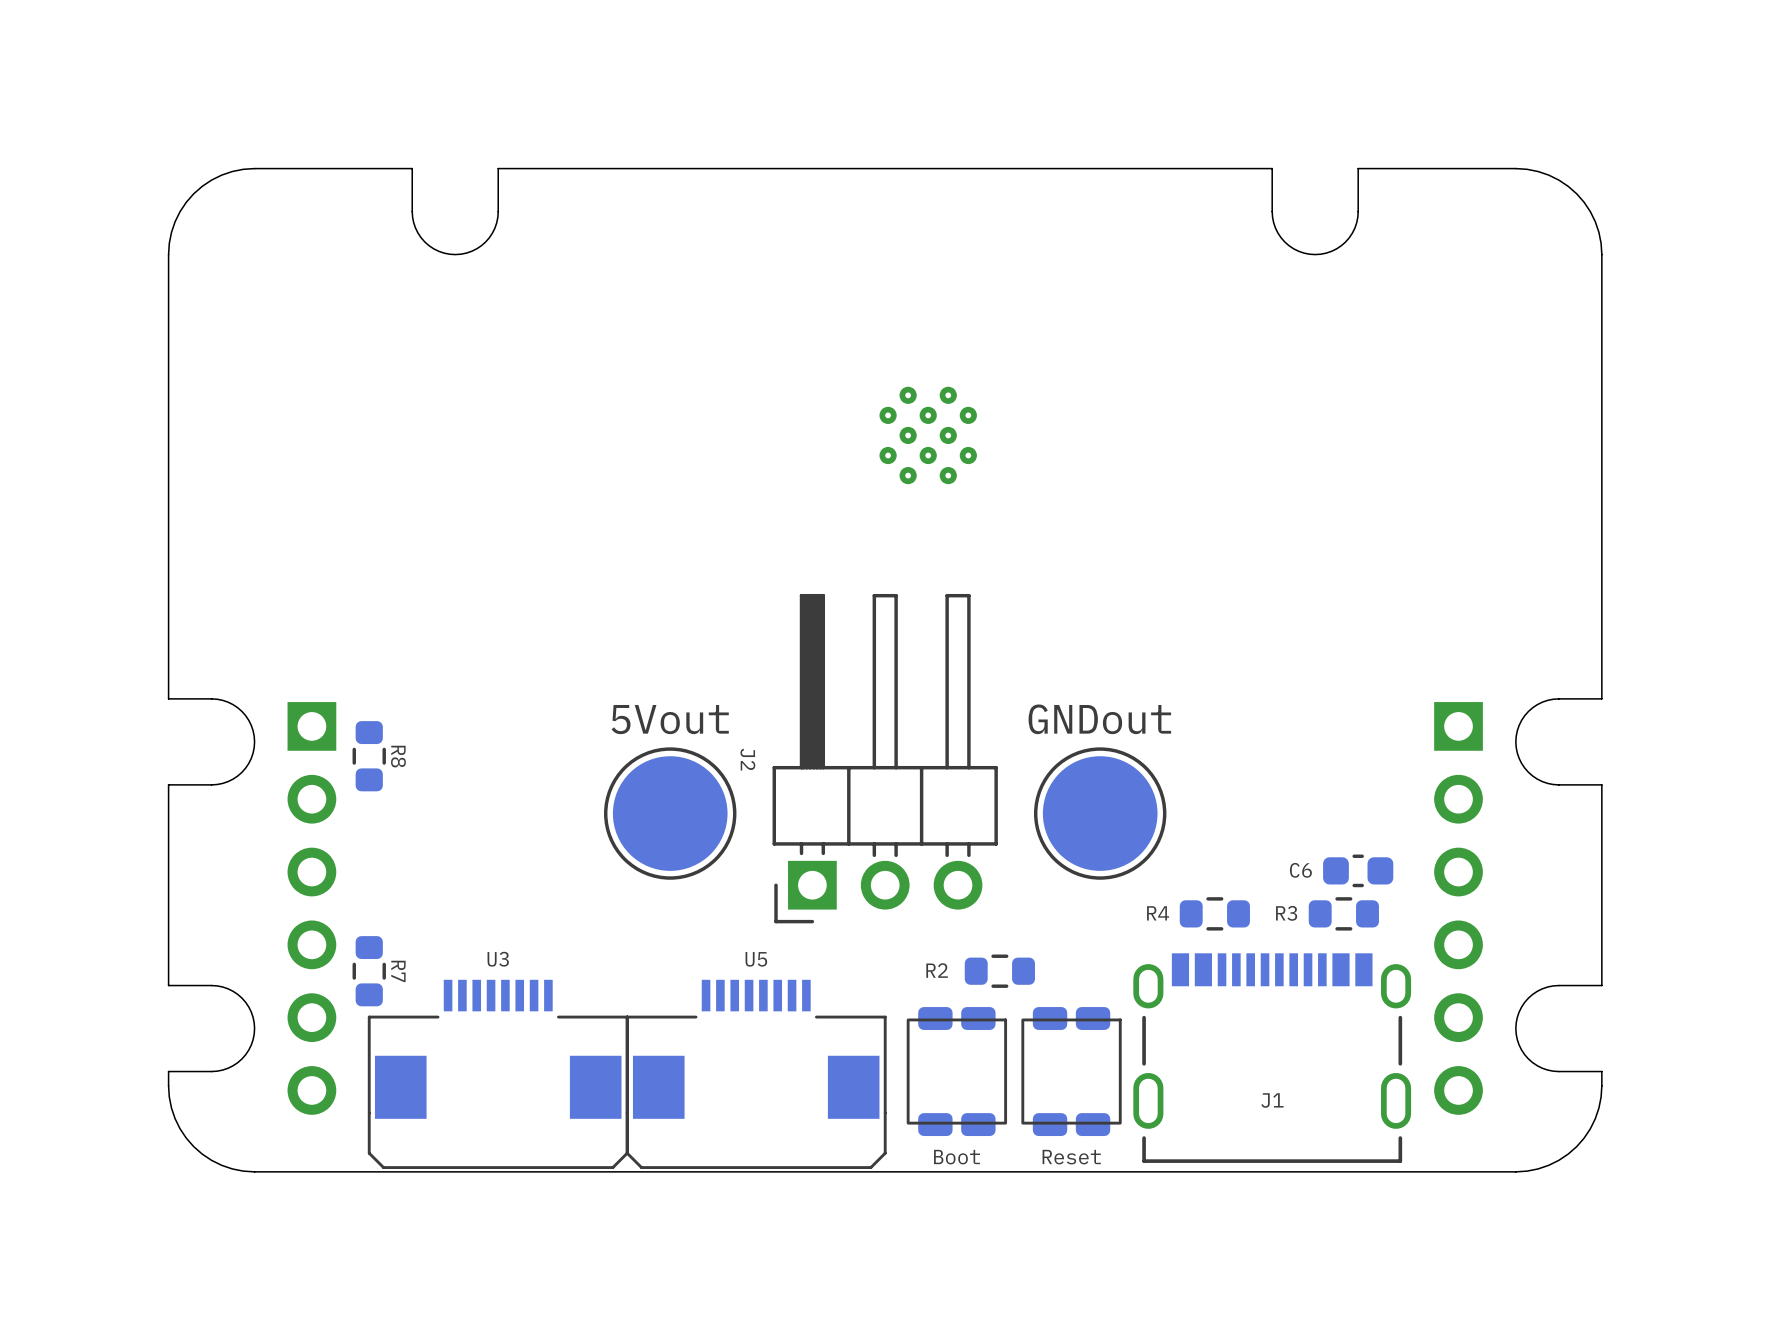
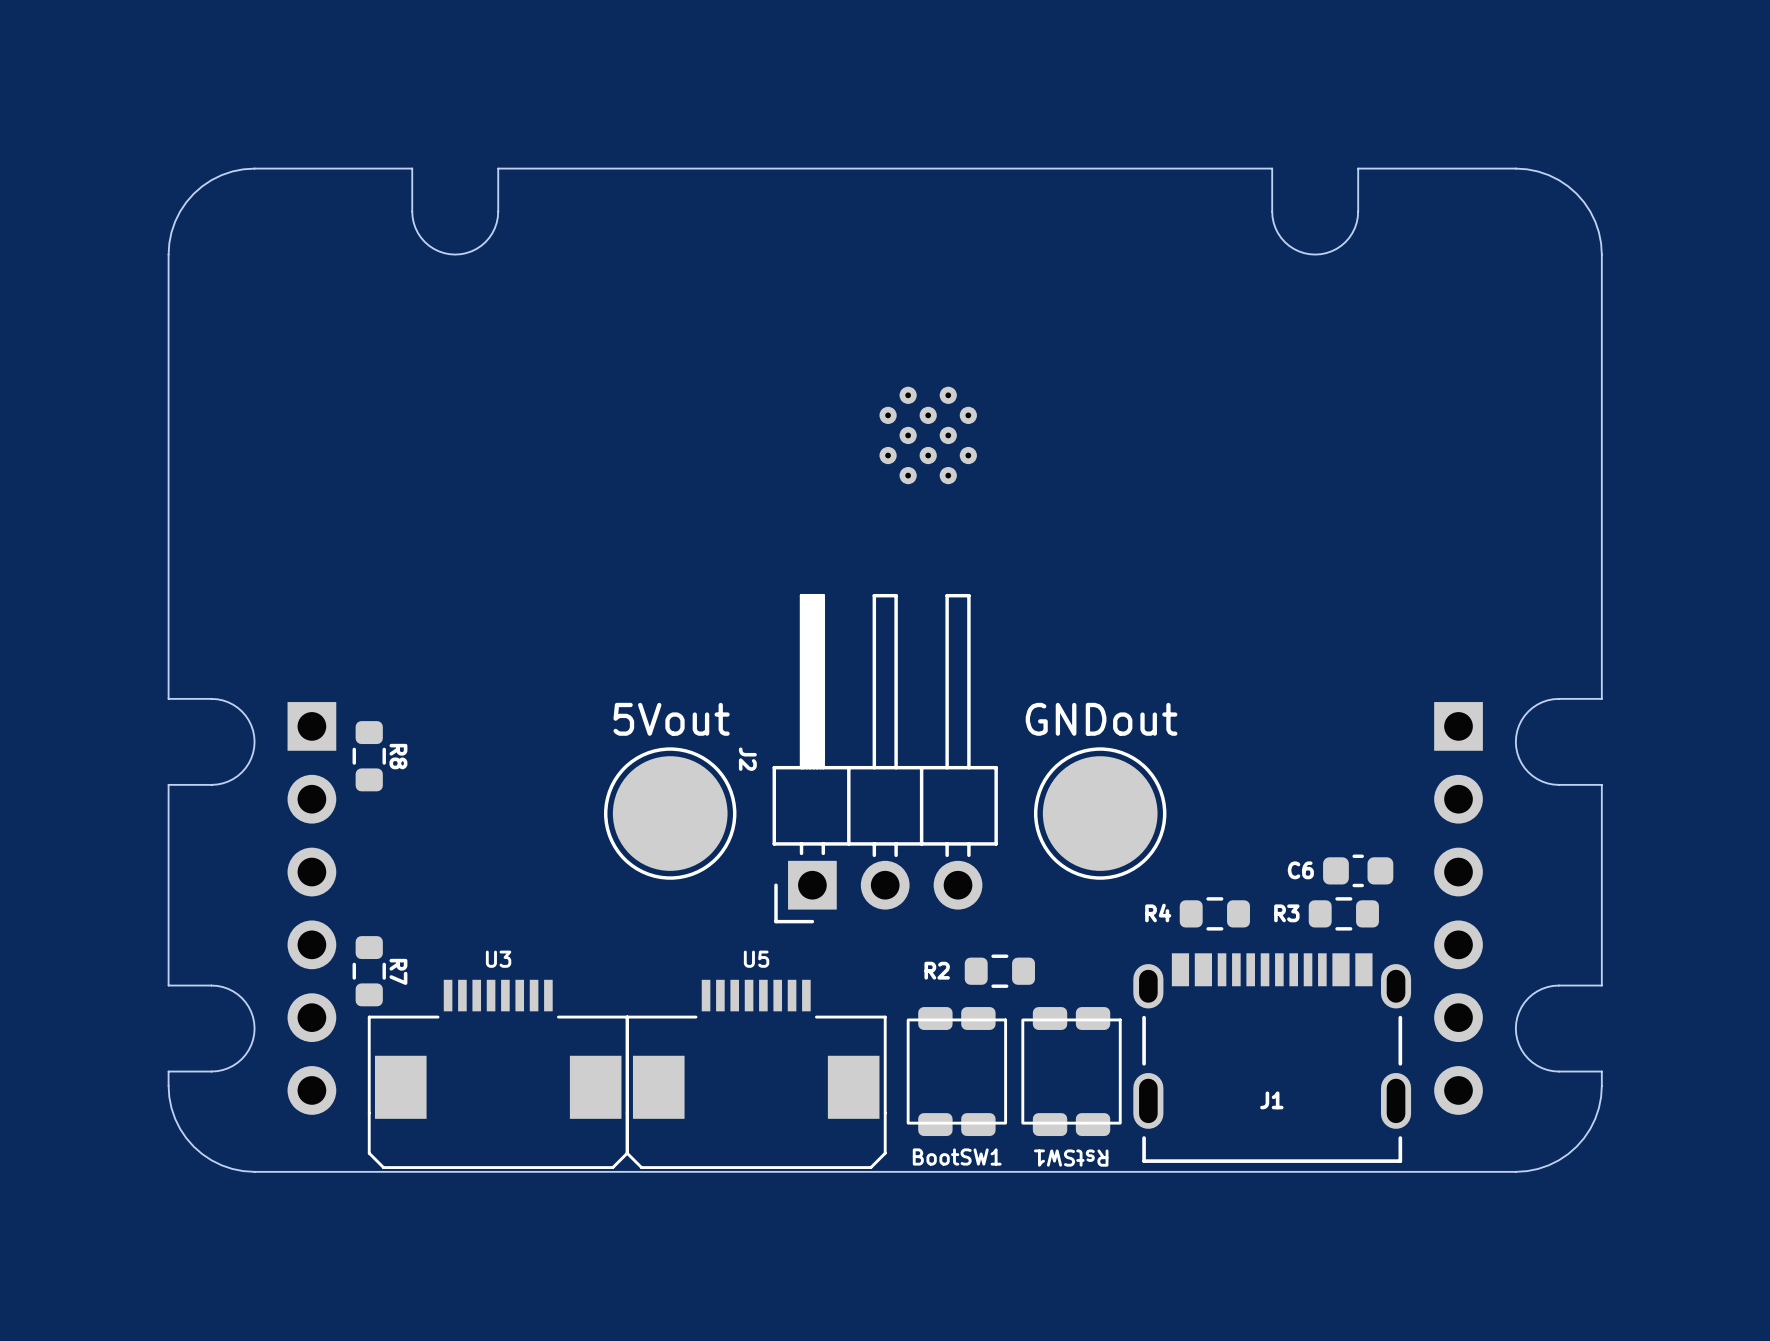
BootSW1 name: none -> BootSW1 (957, 1156)
BootSW1 value: Boot (957, 1157) -> none
RstSW1 value: Reset (1071, 1157) -> none
RstSW1 name: none -> RstSW1 (1071, 1158)

